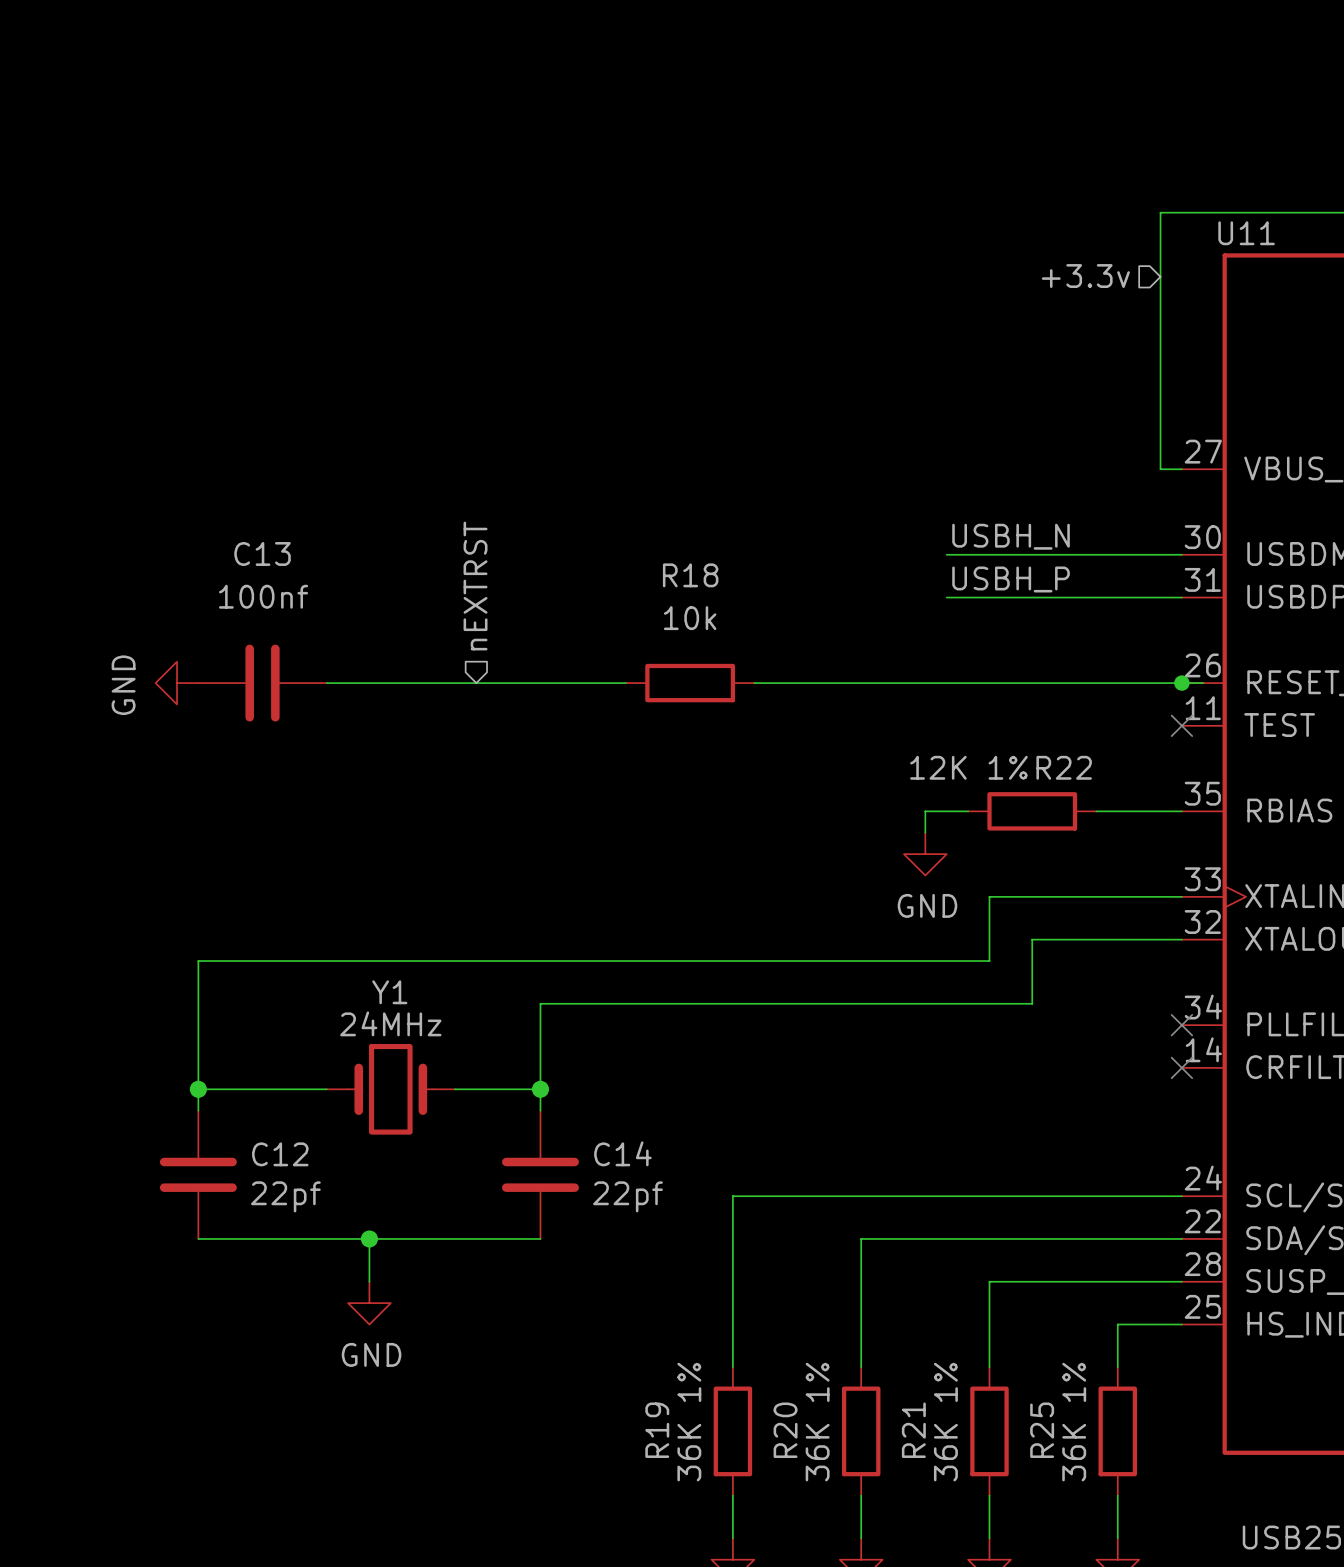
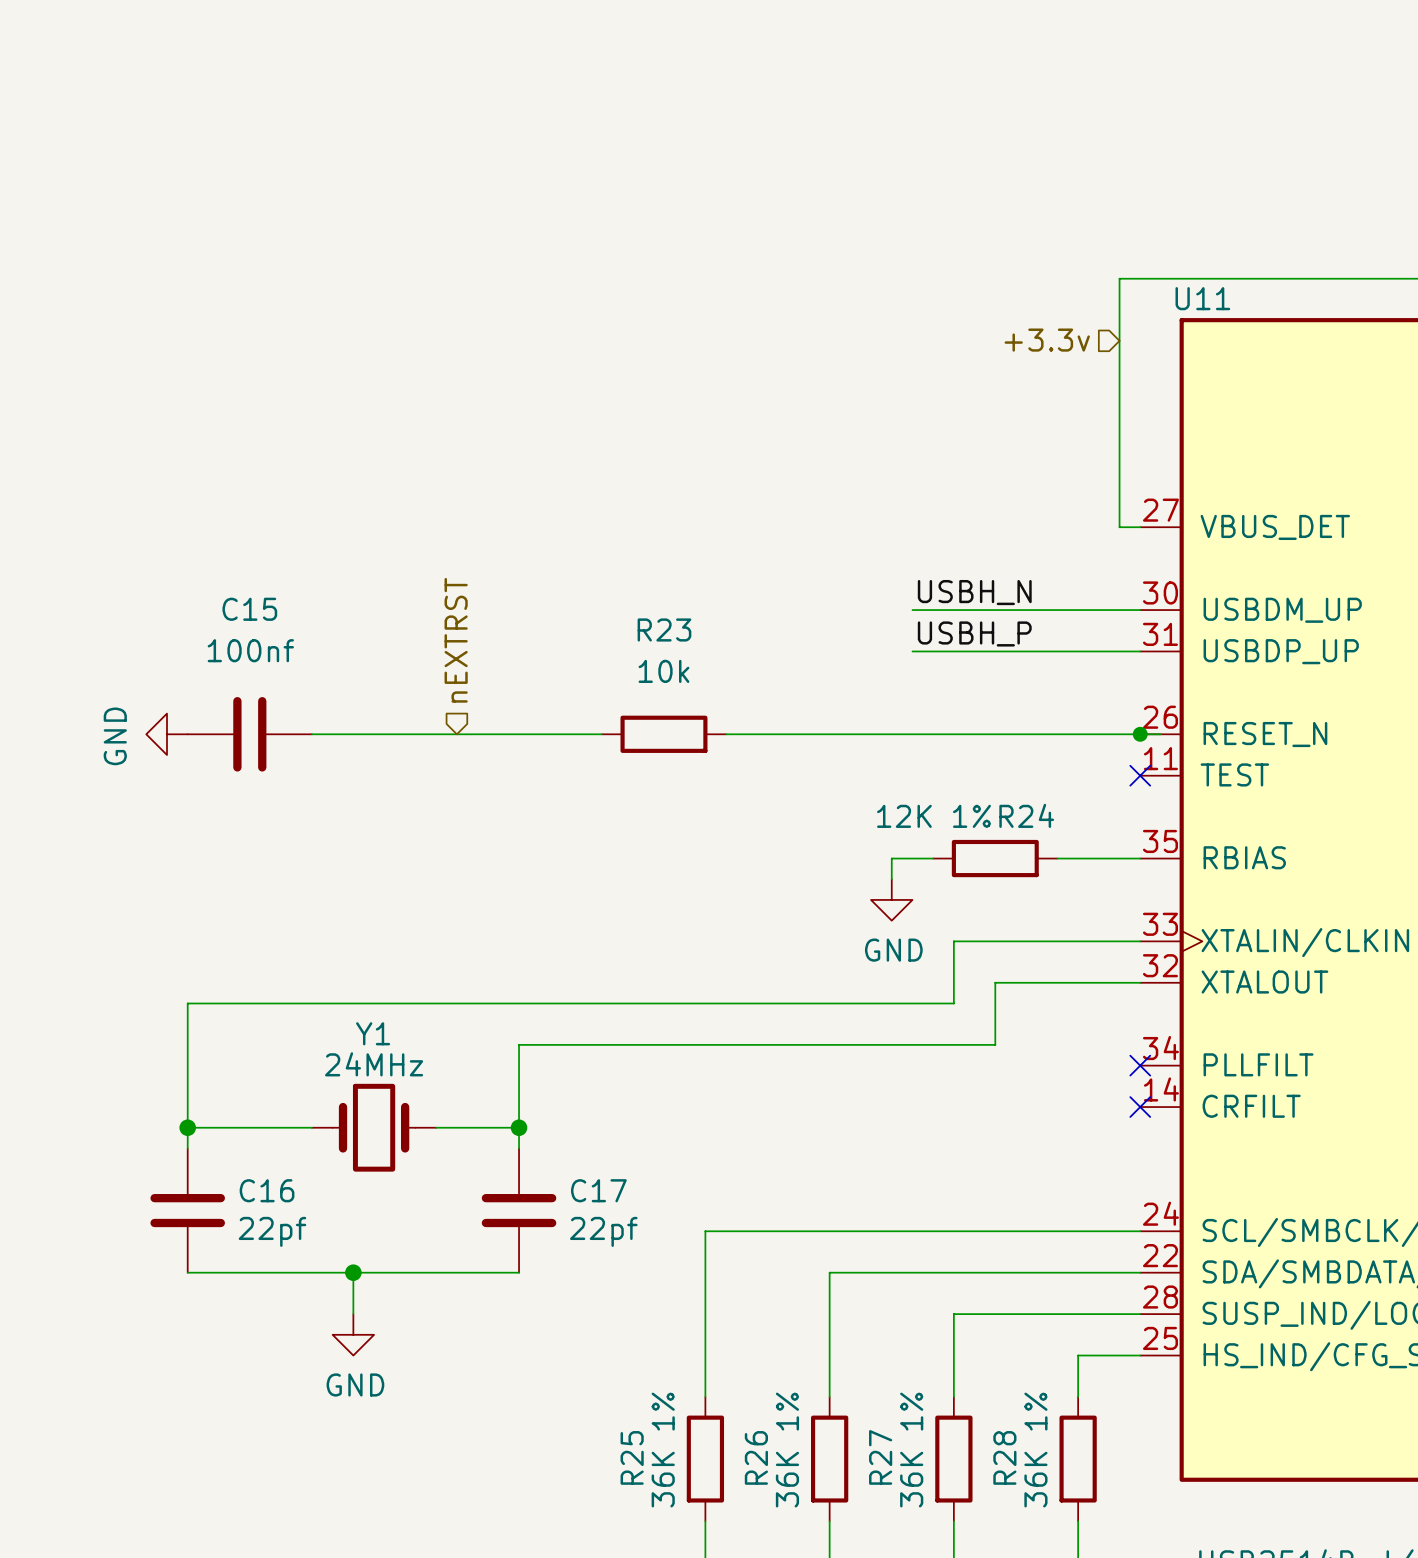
C13 name: C13 (262, 553) -> C15 (249, 609)
R18 name: R18 (690, 575) -> R23 (664, 629)
R22 name: R22 (1064, 767) -> R24 (1026, 815)
C14 name: C14 (622, 1153) -> C17 (598, 1190)
C12 name: C12 (280, 1154) -> C16 (267, 1190)
R19 name: R19 (657, 1430) -> R25 (632, 1457)
R20 name: R20 (785, 1430) -> R26 (756, 1457)
R21 name: R21 (913, 1430) -> R27 (880, 1457)
R25 name: R25 (1042, 1430) -> R28 (1004, 1457)

